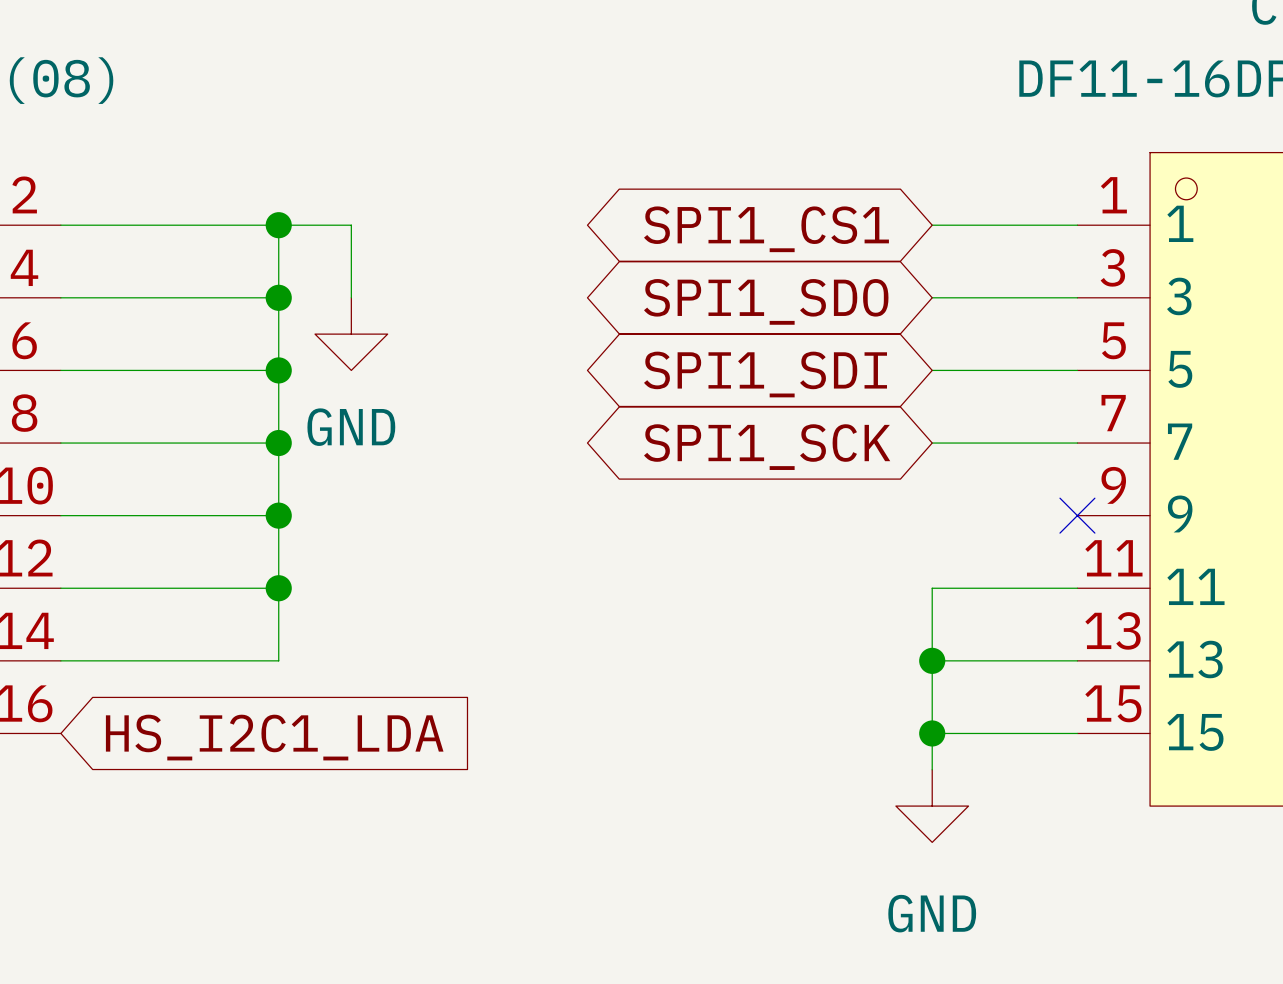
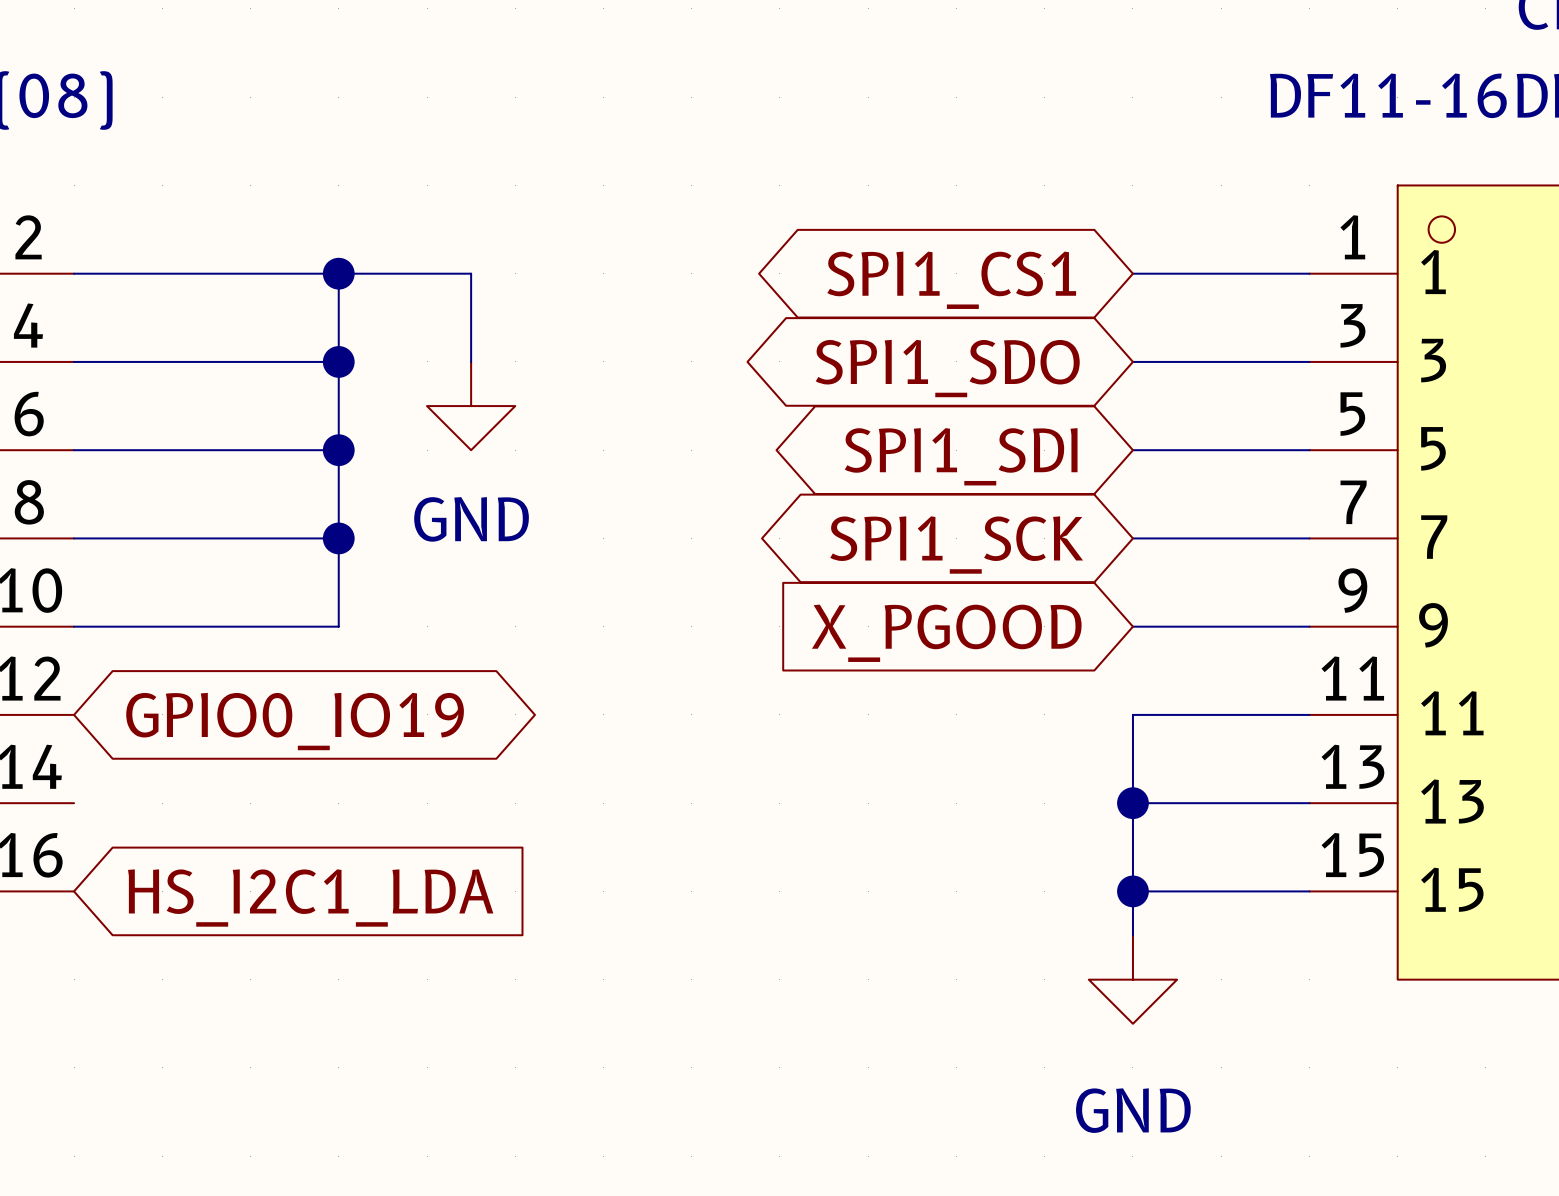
wire: (351, 225) (351, 297) -> (427, 273) (471, 273) (471, 361)
power symbol position: GND (351, 334) -> GND (471, 406)
wire: (278, 515) (278, 660) (60, 660) -> none
junction: (278, 515) -> none
wire: none -> (1132, 626) (1309, 626)
no-connect mark: (1077, 515) -> none
global label: none -> X_PGOOD (946, 633)
wire: (60, 588) (278, 588) -> none
junction: (278, 588) -> none
global label: none -> GPIO0_IO19 (295, 721)

